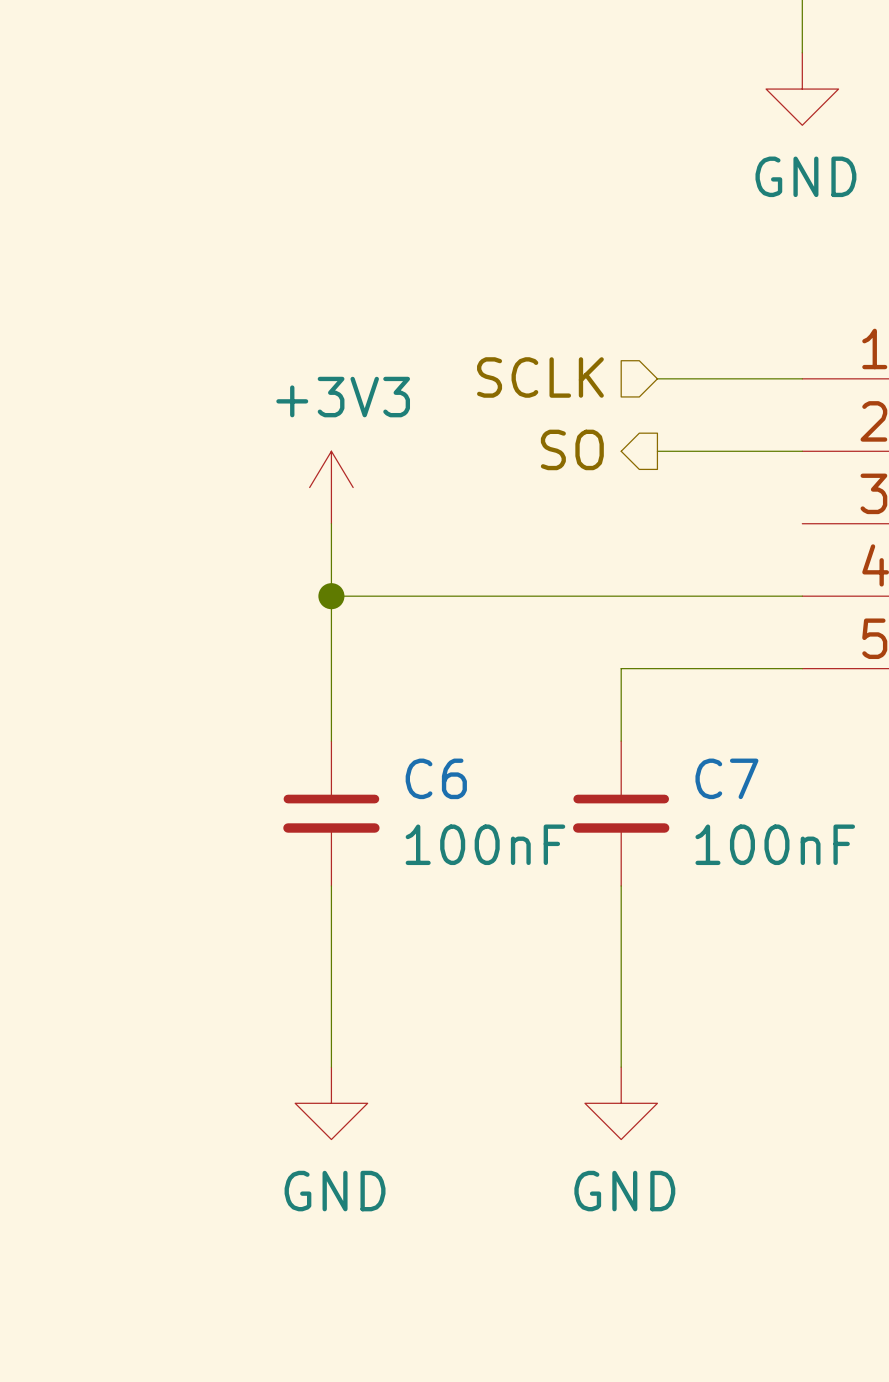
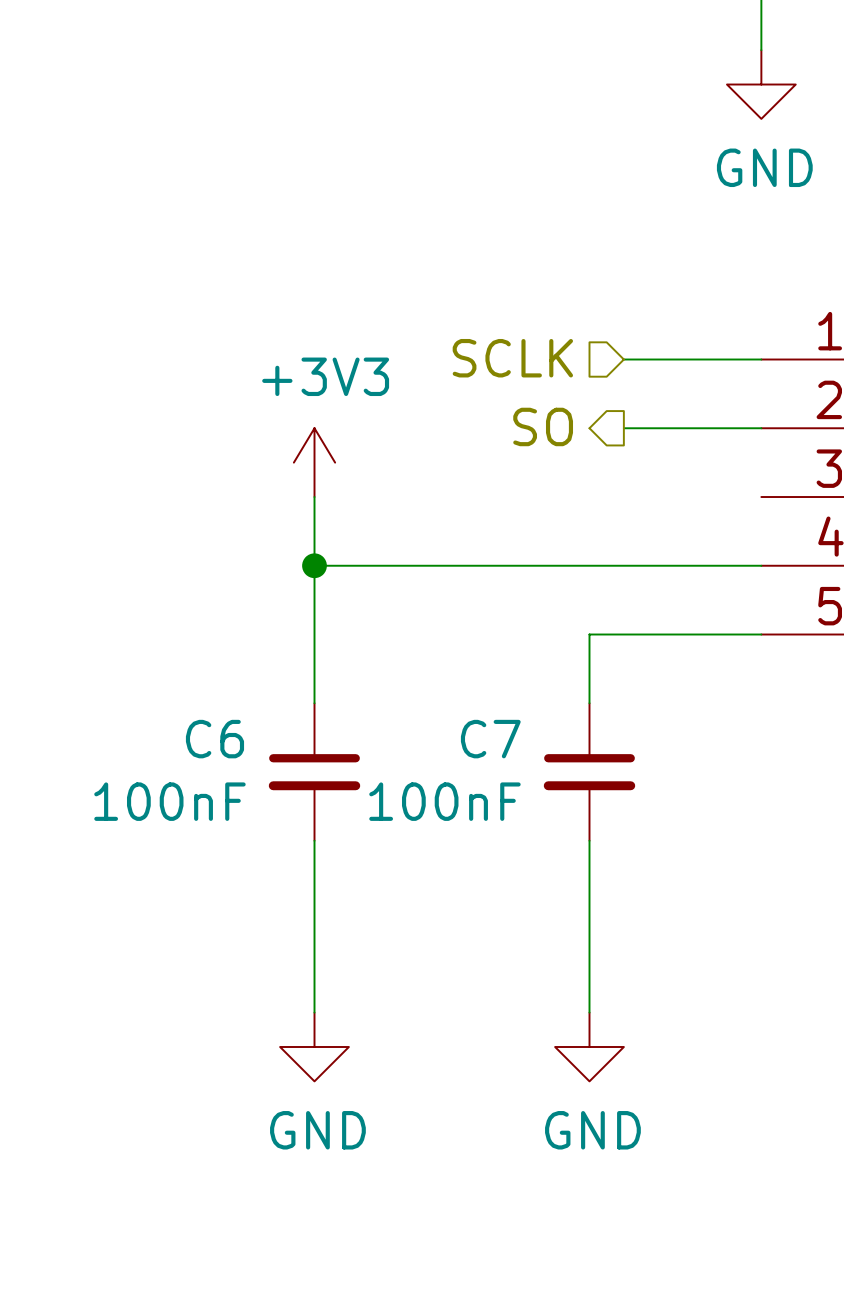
C6 name position: C6 (436, 778) -> C6 (214, 739)
C7 name position: C7 (726, 778) -> C7 (490, 739)
C6 value position: 100nF (485, 844) -> 100nF (169, 801)
C7 value position: 100nF (775, 844) -> 100nF (444, 801)

